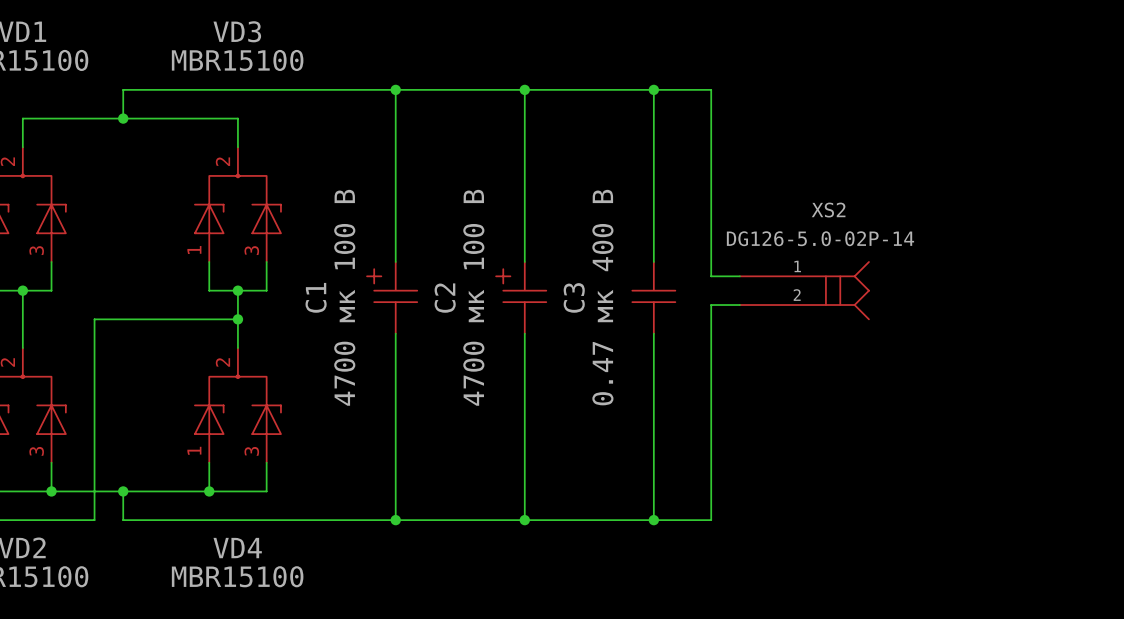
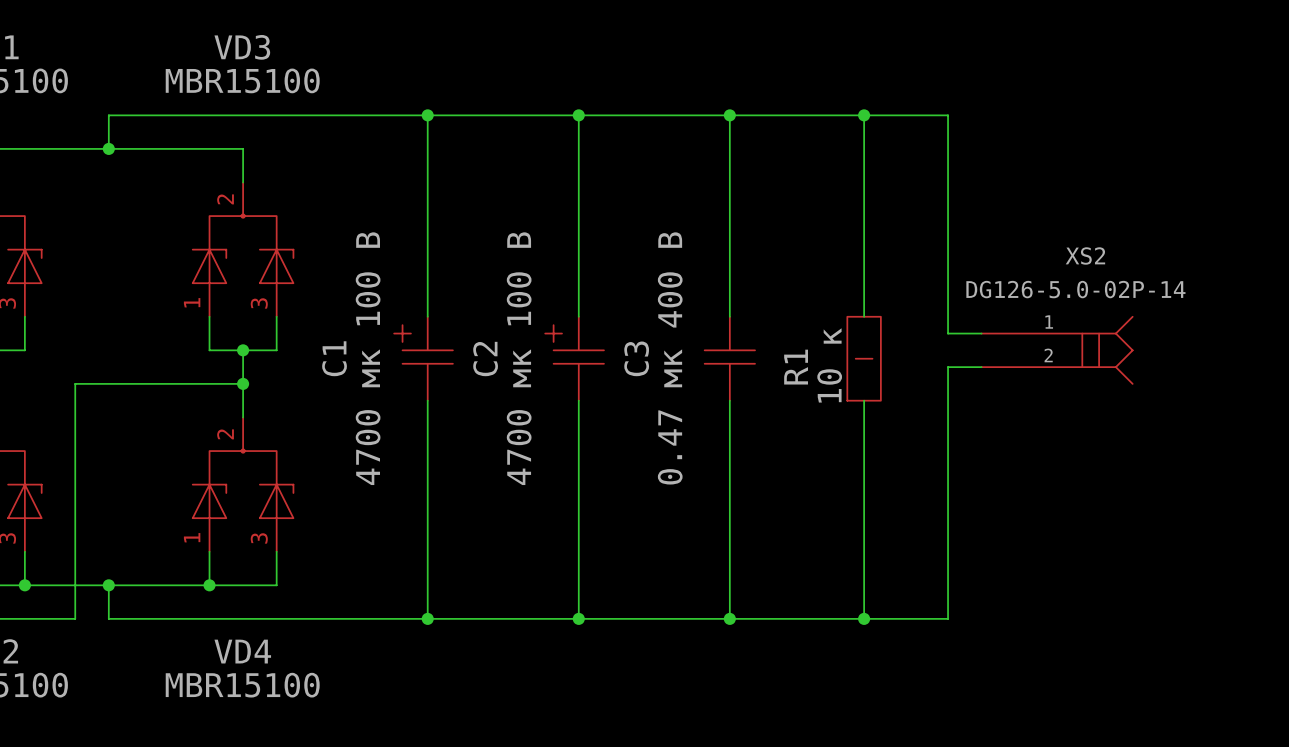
wire: (711, 89) (711, 276) (739, 276) -> (796, 115) (948, 115) (948, 333) (981, 333)
wire: none -> (864, 115) (864, 316)
junction: none -> (864, 115)
XS2 position: (804, 290) -> (1057, 350)
R1: none -> 10 к (864, 358)
wire: (739, 305) (711, 305) (711, 520) -> (981, 367) (948, 367) (948, 618) (796, 618)
wire: none -> (864, 400) (864, 618)
junction: none -> (864, 618)

